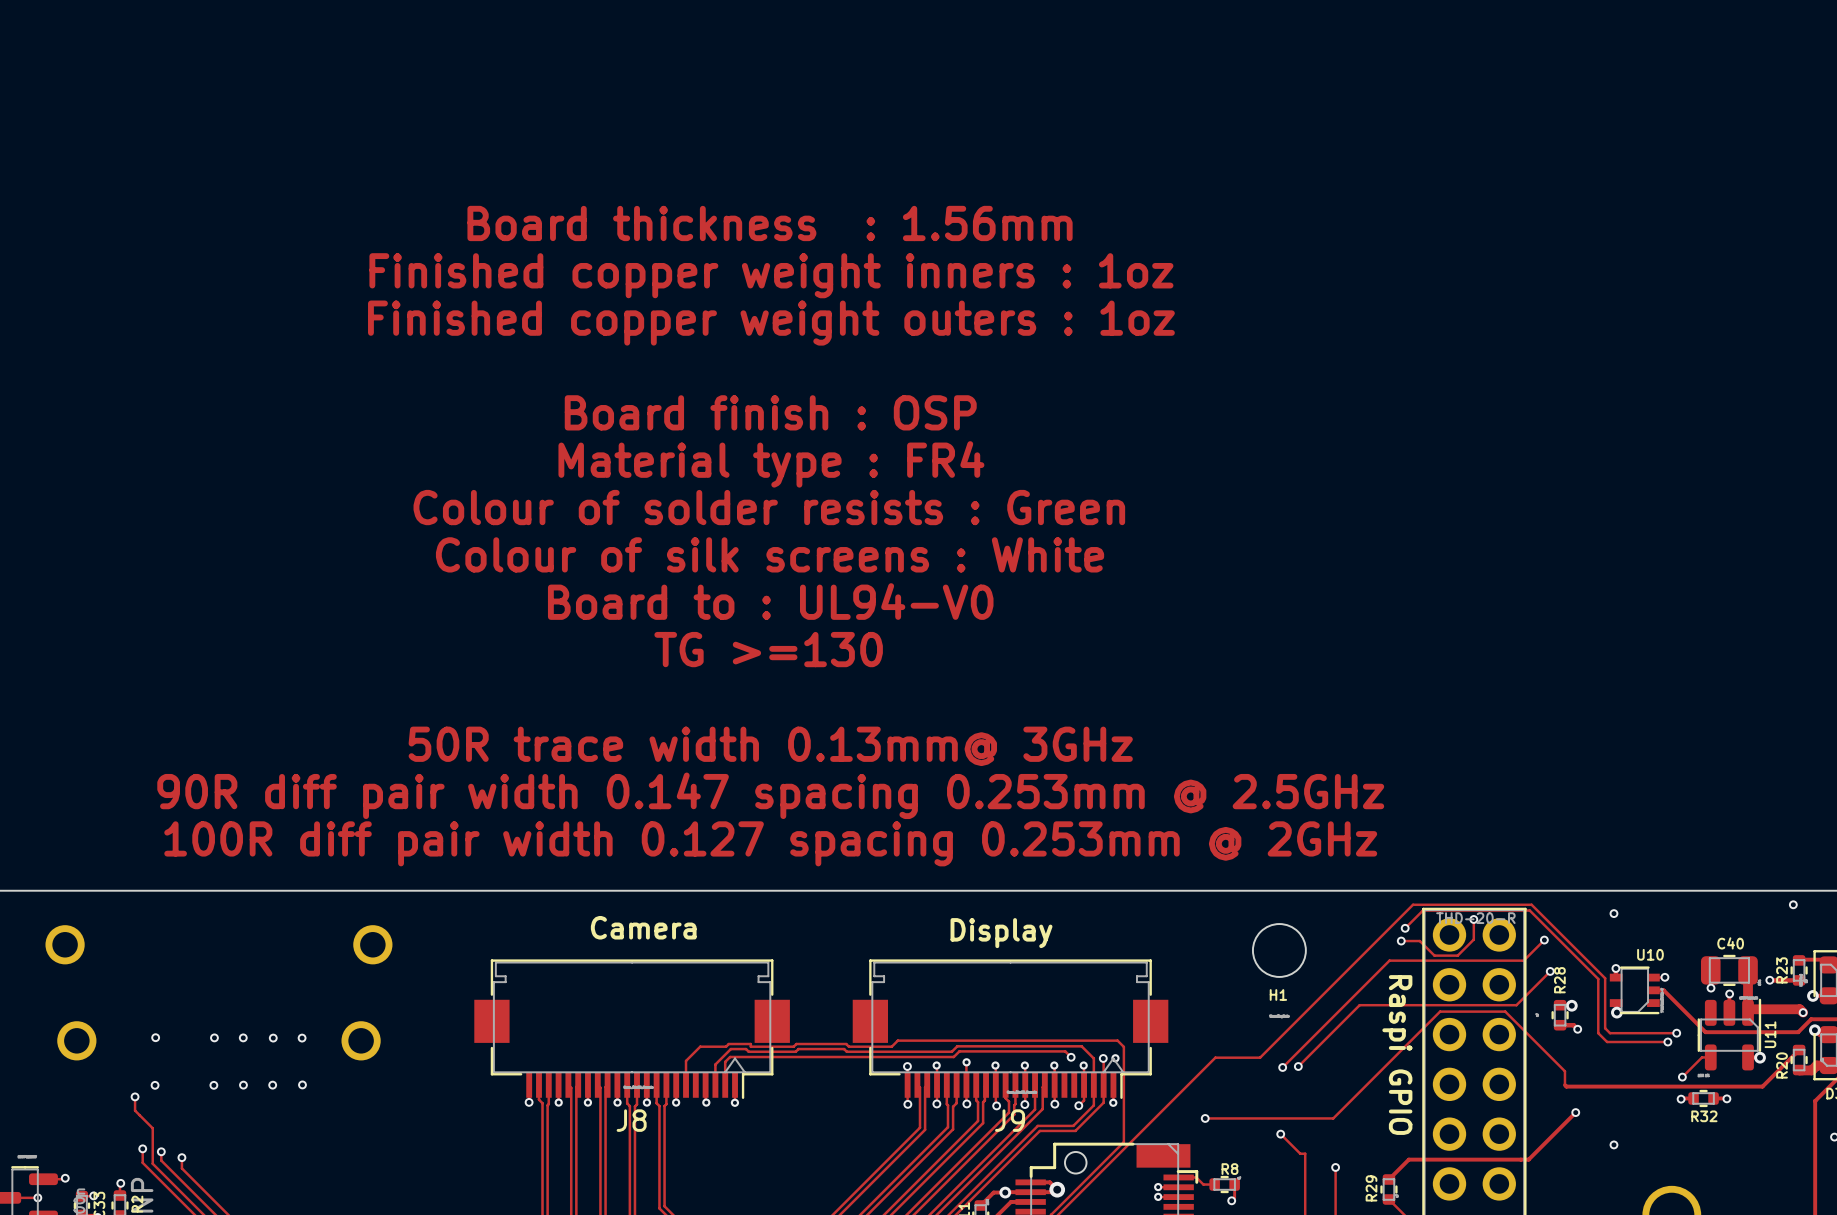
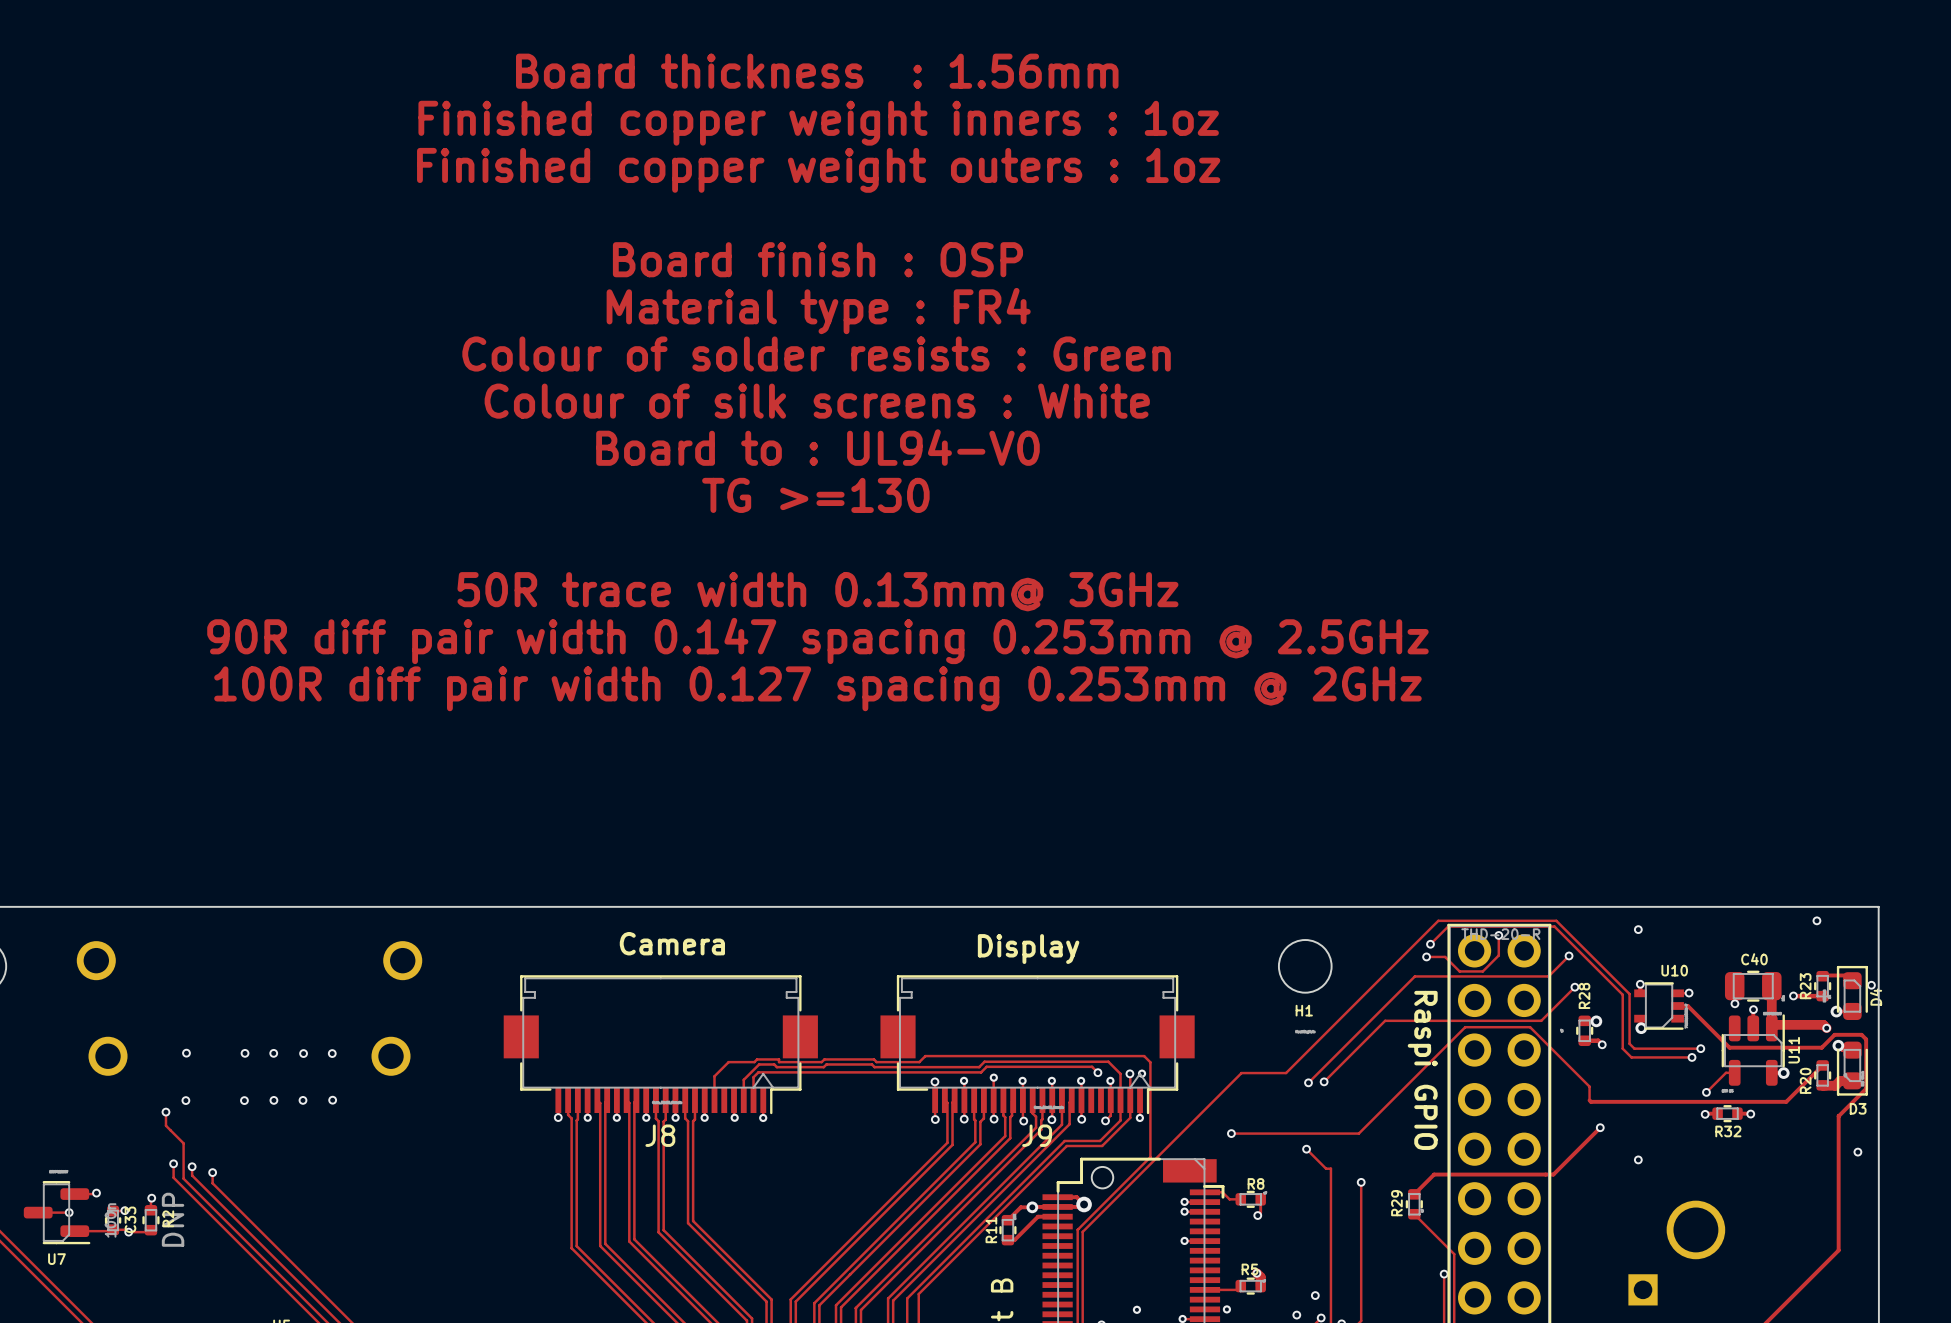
text position: Board thickness : 1.56mm (770, 223) -> Board thickness : 1.56mm (817, 71)
text position: Finished copper weight inners : 1oz (771, 275) -> Finished copper weight inners : 1oz (818, 123)
text position: Finished copper weight outers : 1oz (771, 323) -> Finished copper weight outers : 1oz (818, 170)
text position: Board finish : OSP (770, 412) -> Board finish : OSP (817, 259)
text position: Material type : FR4 (771, 464) -> Material type : FR4 (818, 311)
text position: Colour of solder resists : Green (769, 507) -> Colour of solder resists : Green (816, 353)
text position: Colour of silk screens : White (770, 554) -> Colour of silk screens : White (817, 401)
text position: Board to : UL94-V0 (770, 601) -> Board to : UL94-V0 (817, 447)
text position: TG >=130 (768, 649) -> TG >=130 (815, 495)
text position: 50R trace width 0.13mm@ 3GHz (770, 746) -> 50R trace width 0.13mm@ 3GHz (817, 591)
text position: 90R diff pair width 0.147 spacing 0.253mm @ 2.5GHz (770, 795) -> 90R diff pair width 0.147 spacing 0.253mm @ 2.5GHz (817, 640)
text position: 100R diff pair width 0.127 spacing 0.253mm @ 2GHz (770, 843) -> 100R diff pair width 0.127 spacing 0.253mm @ 2GHz (817, 688)

